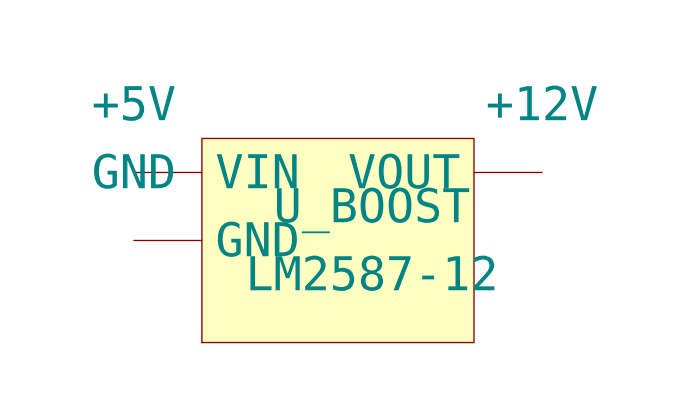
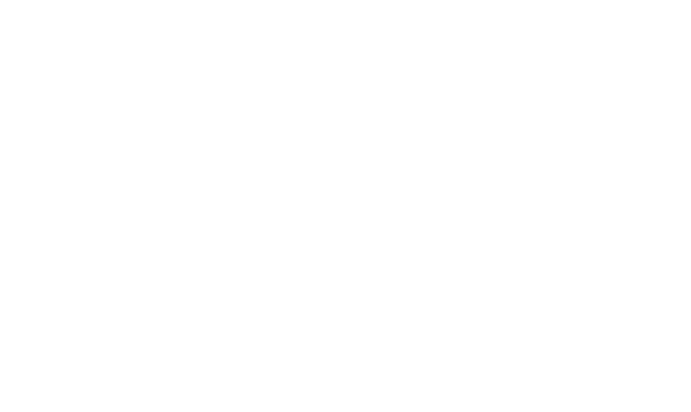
power symbol: +12V (542, 102) -> none
power symbol: +5V (134, 103) -> none
power symbol: GND (133, 171) -> none
U_BOOST: LM2587-12 (337, 240) -> none

